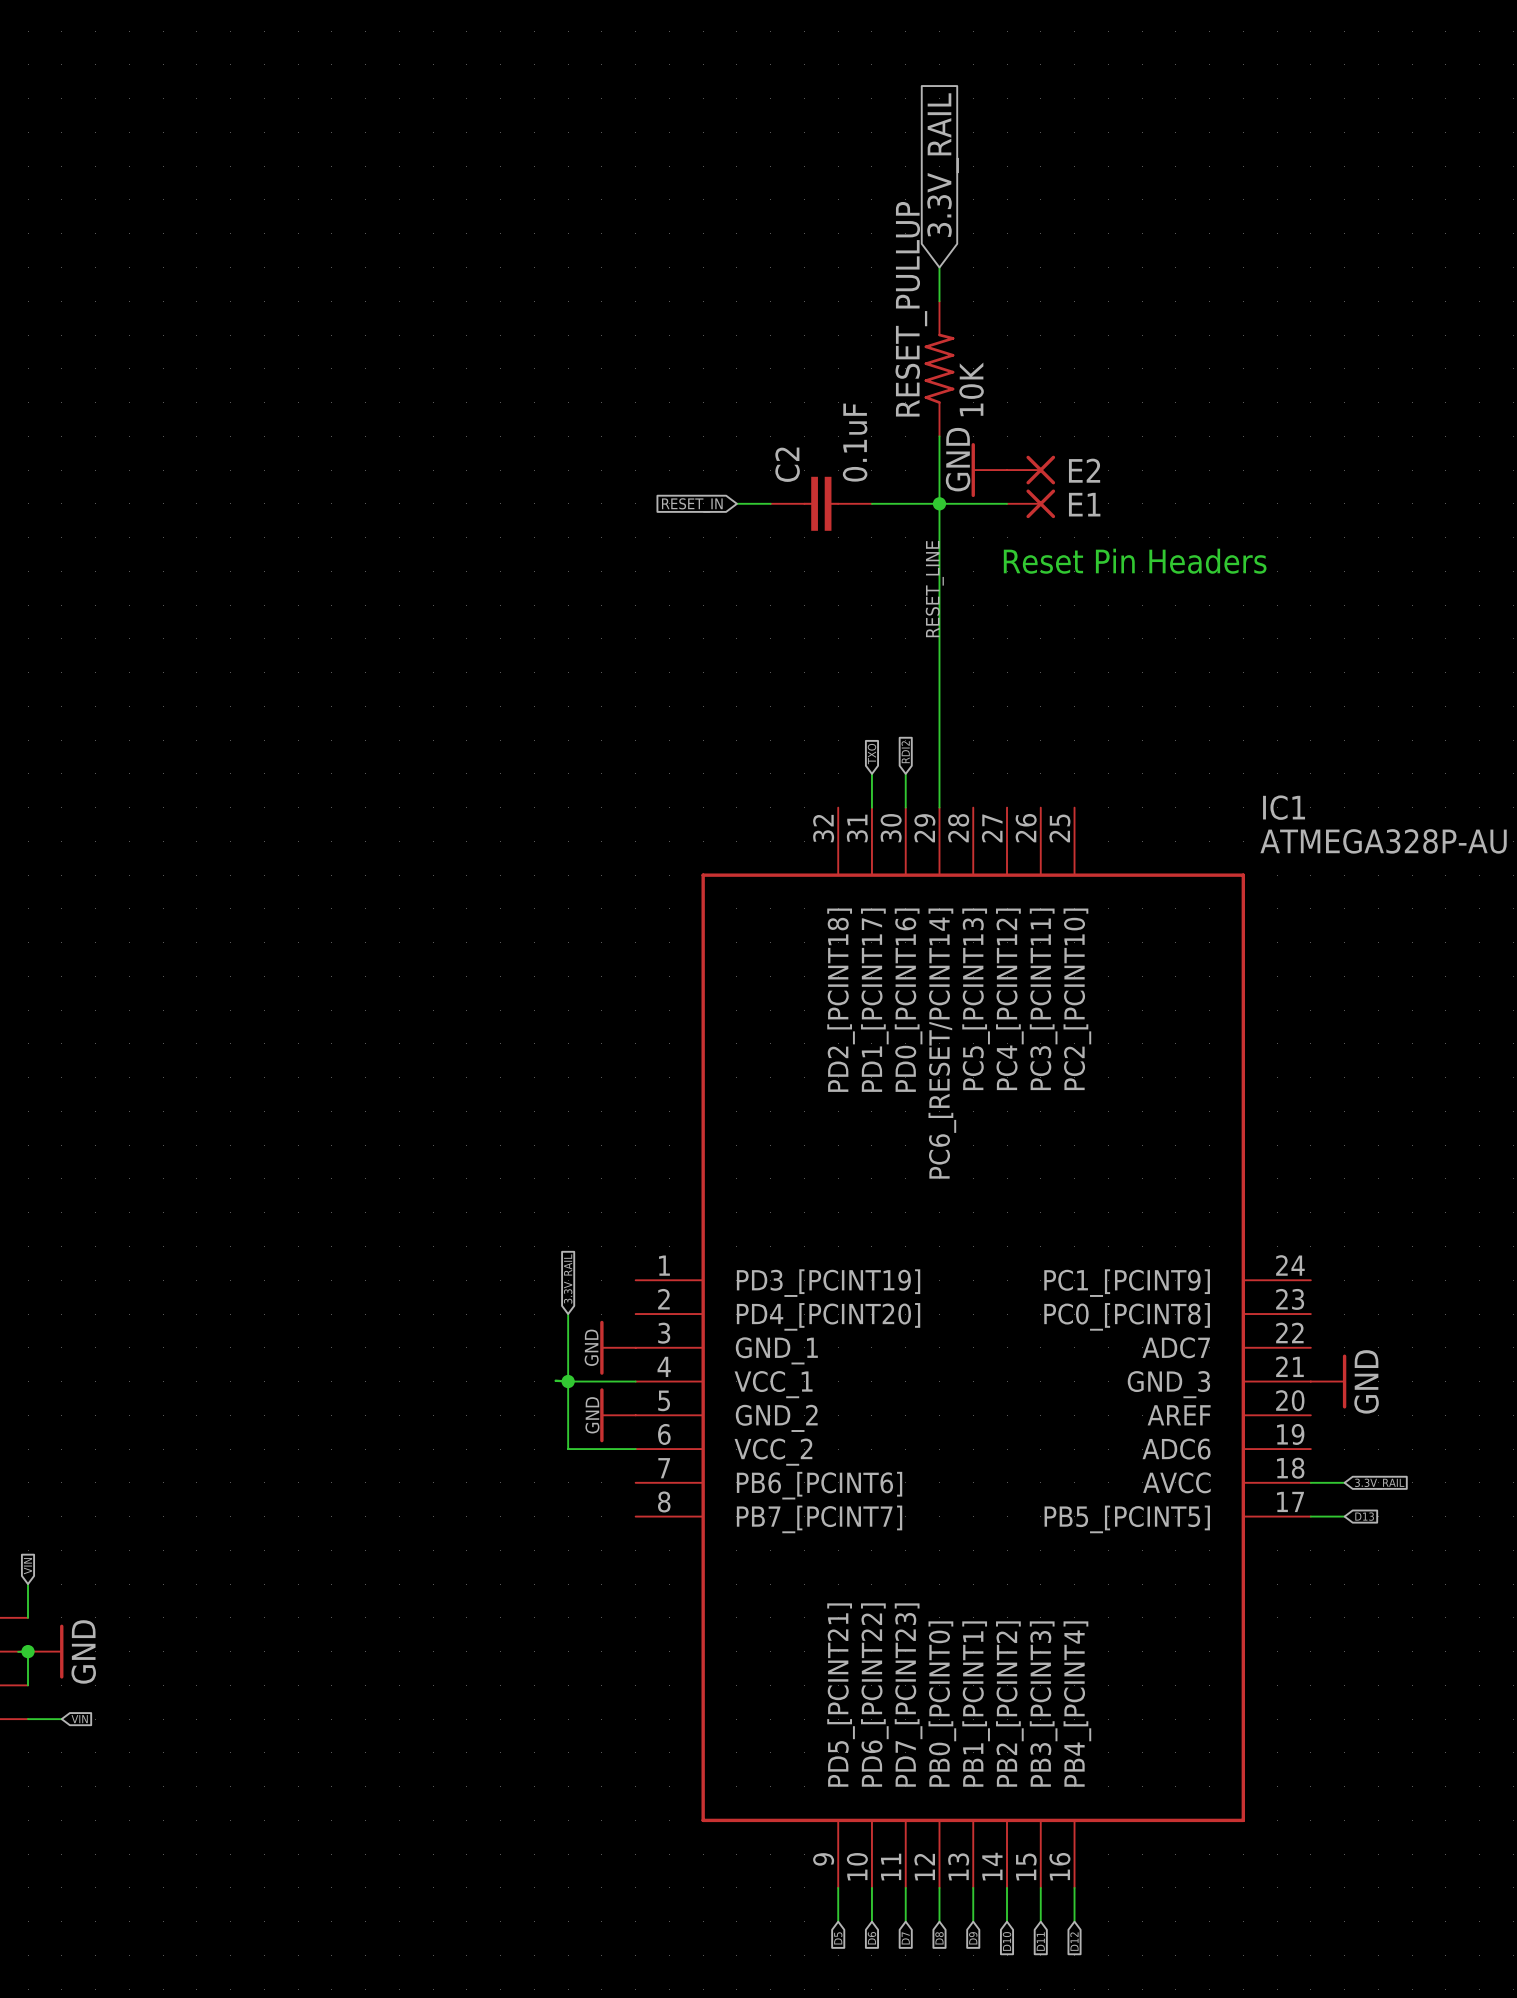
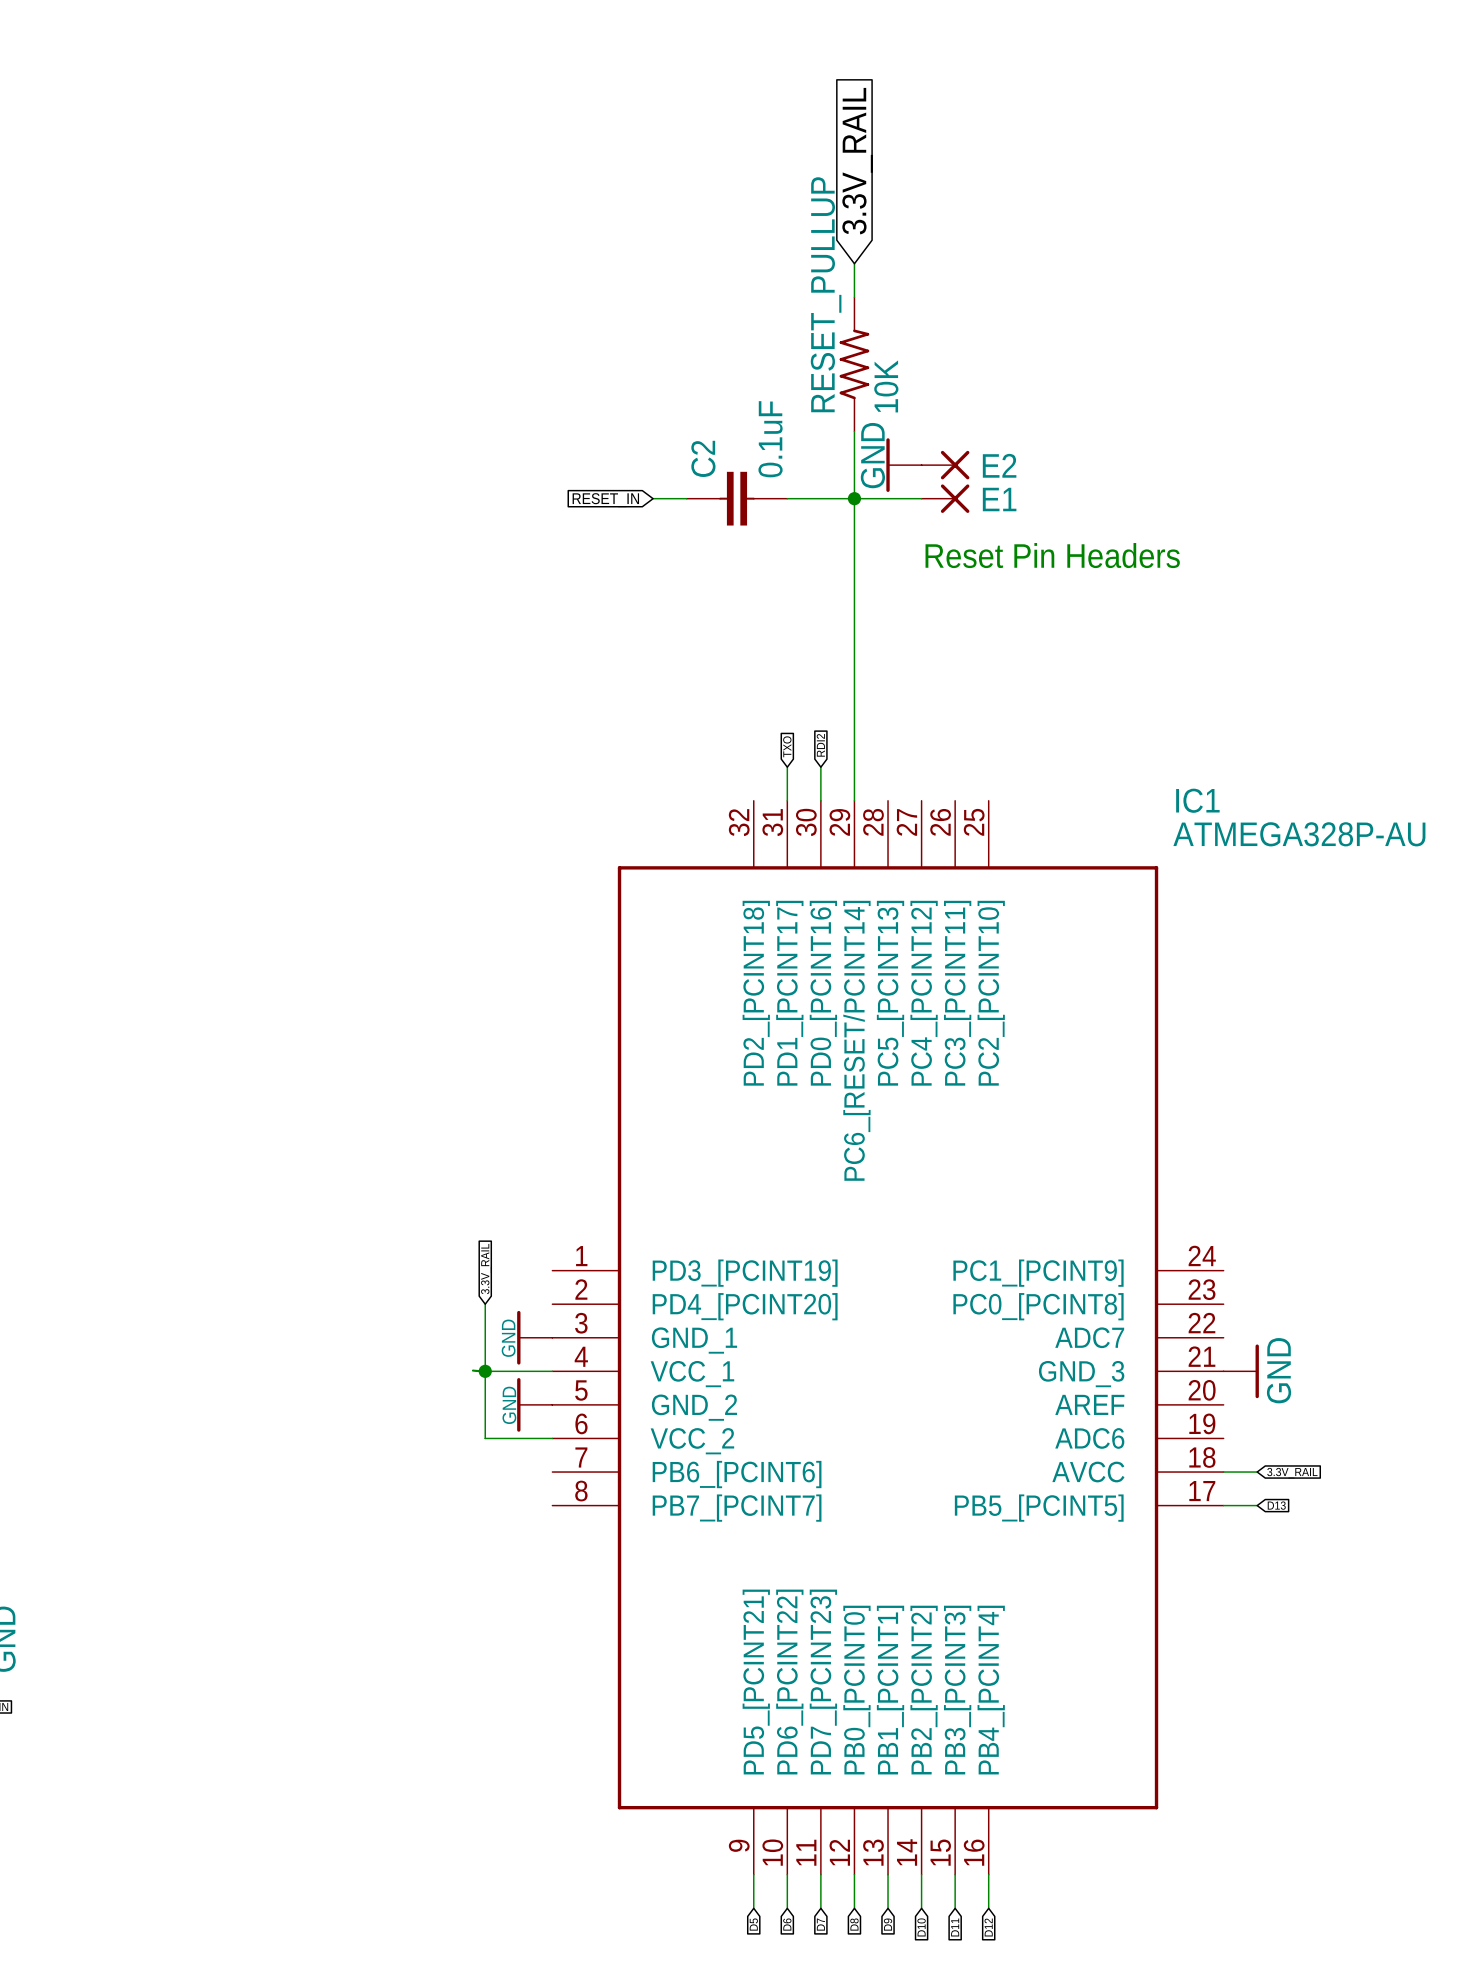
label: RESET_LINE (934, 589) -> none

